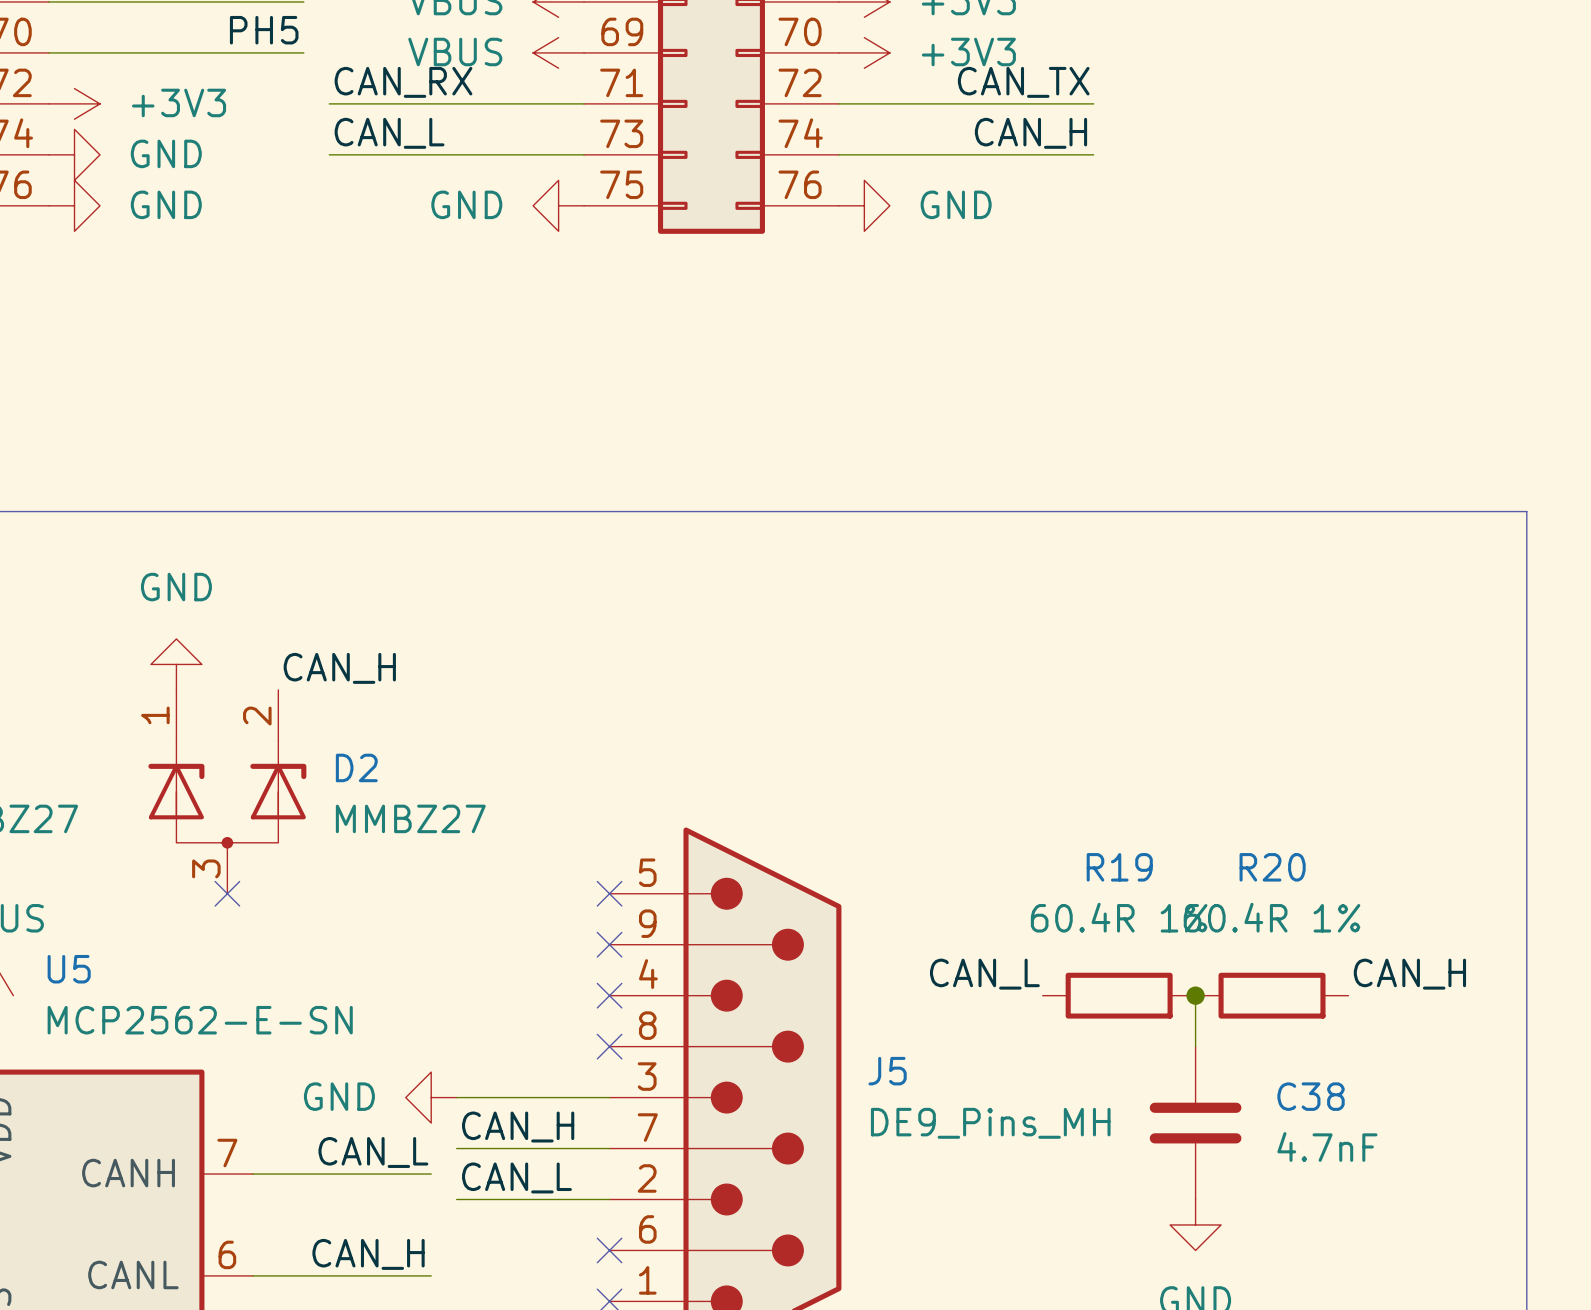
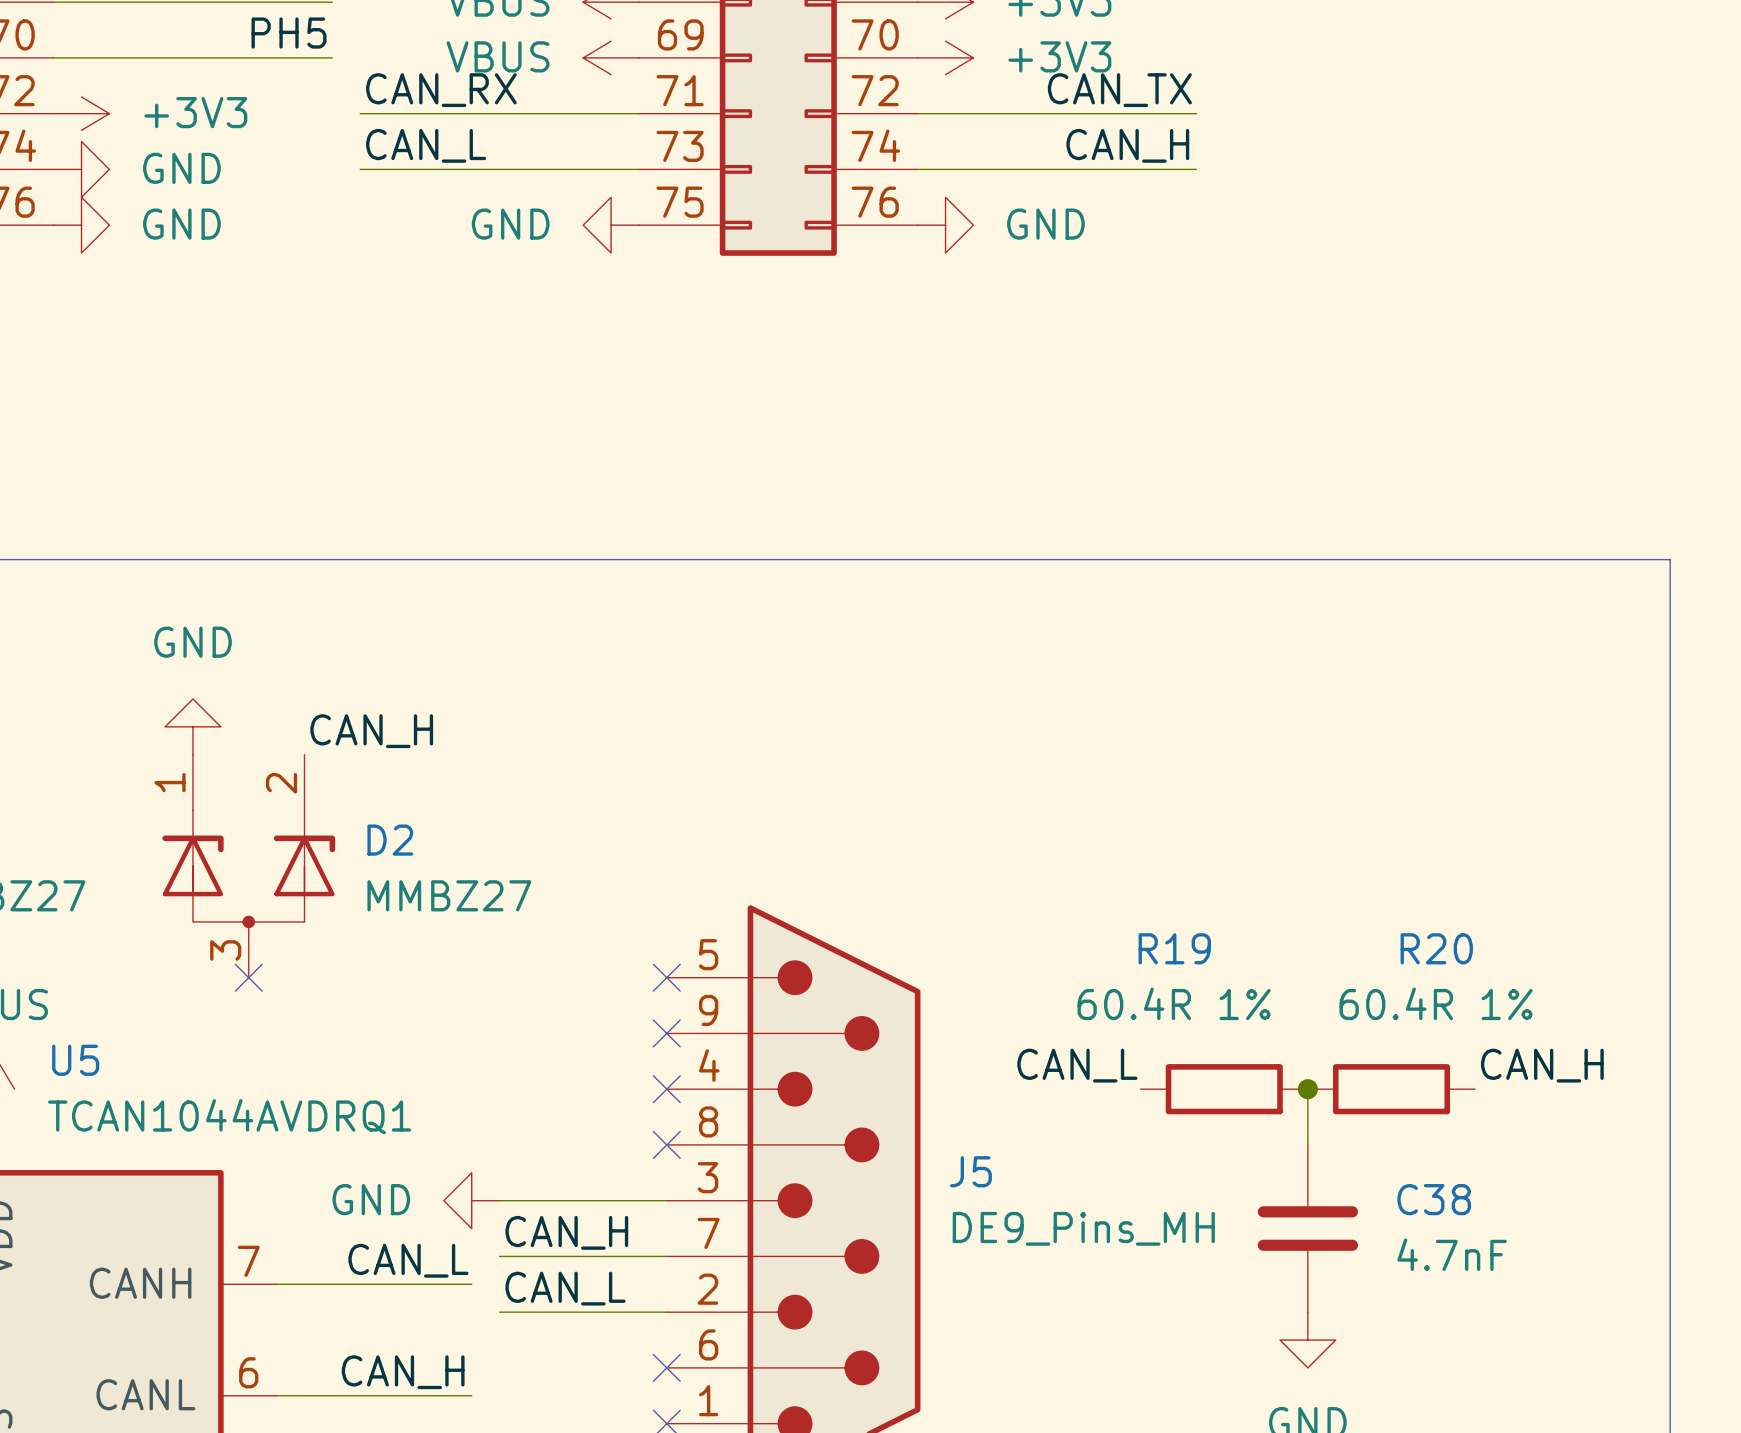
R19 name position: R19 (1119, 867) -> R19 (1174, 948)
R20 name position: R20 (1272, 867) -> R20 (1436, 948)
R19 value position: 60.4R 1% (1119, 917) -> 60.4R 1% (1174, 1003)
R20 value position: 60.4R 1% (1272, 917) -> 60.4R 1% (1436, 1003)
U5 value: MCP2562-E-SN (200, 1020) -> TCAN1044AVDRQ1 (229, 1116)

